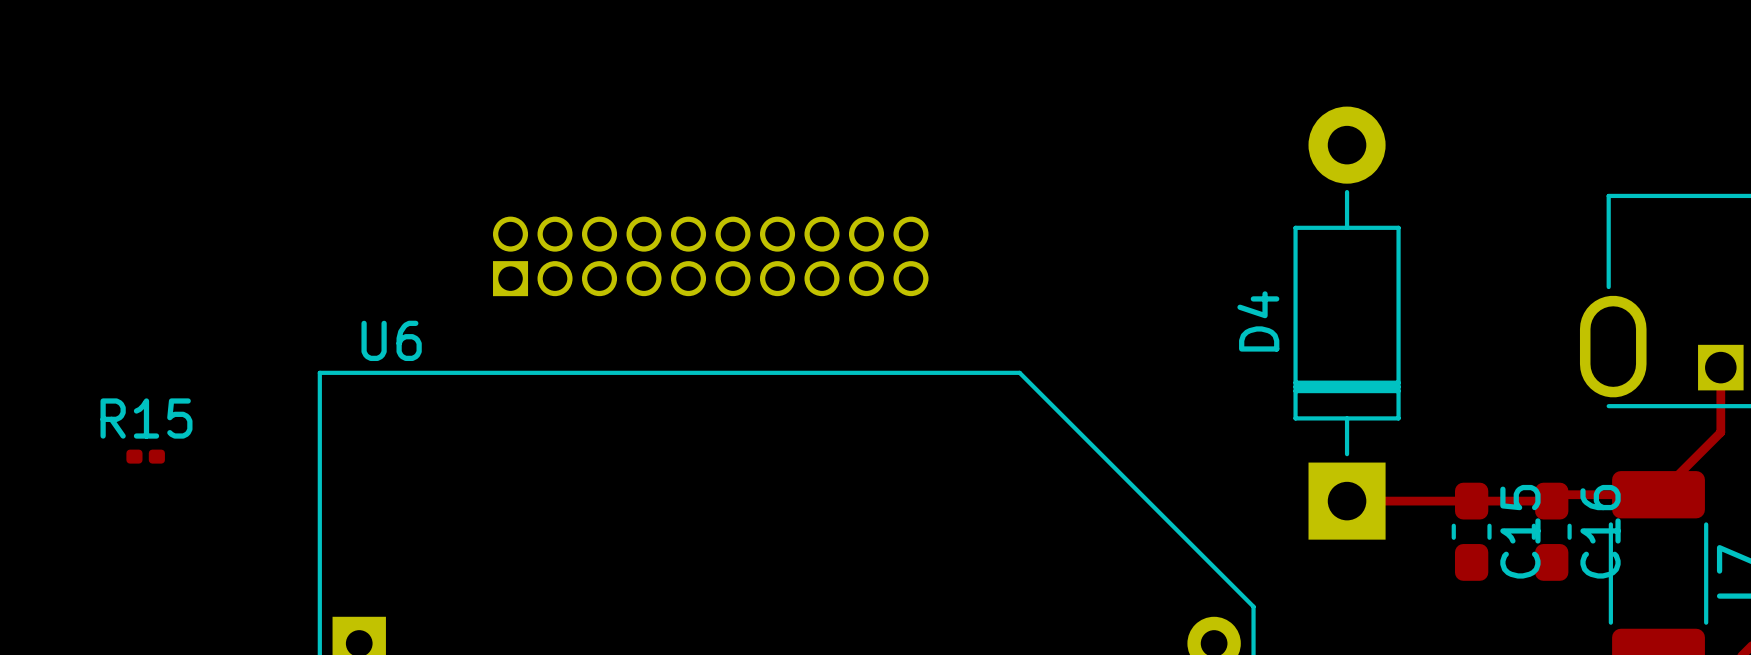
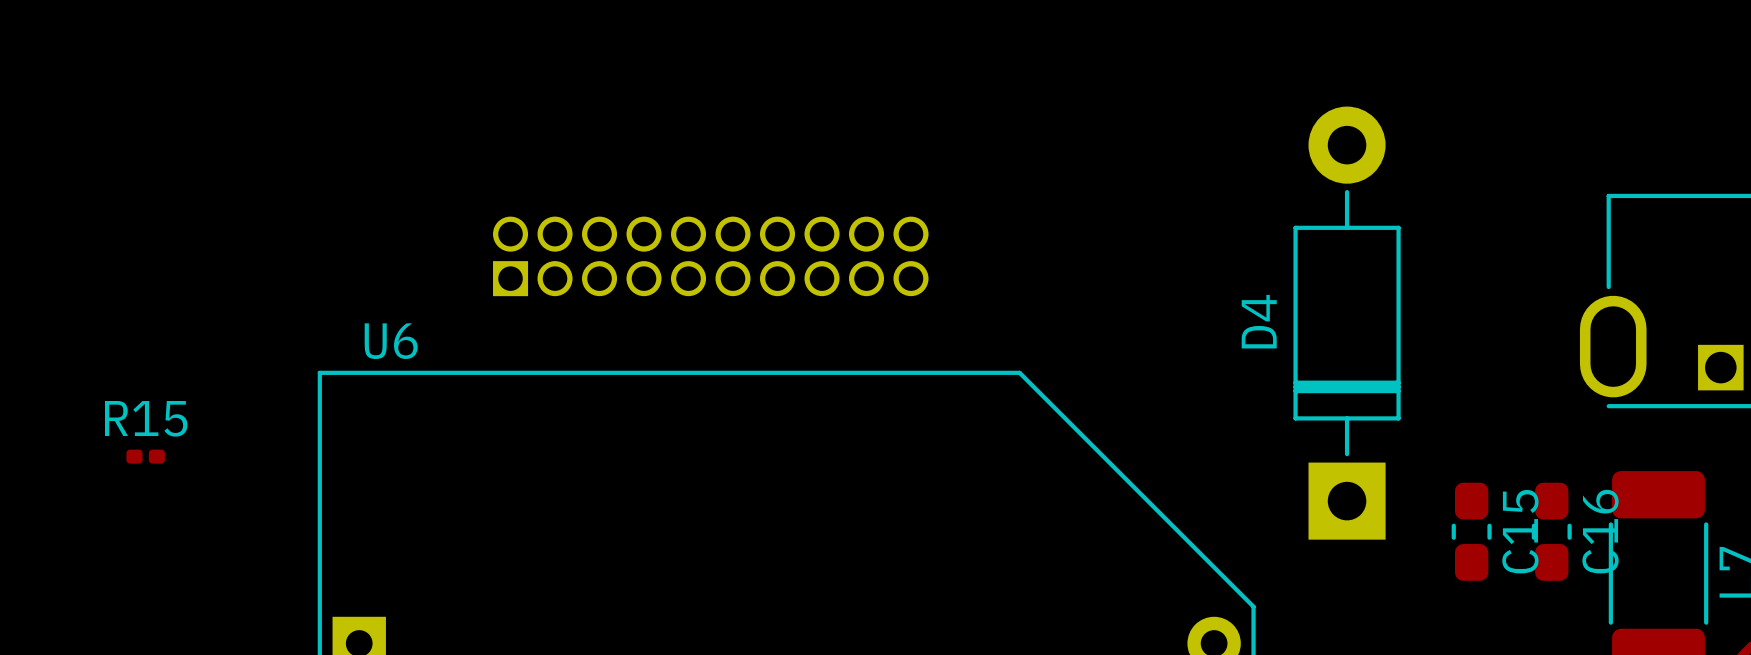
top track: (1720, 367) (1720, 432) (1658, 494) (1558, 494) (1551, 501) (1347, 501) -> none

